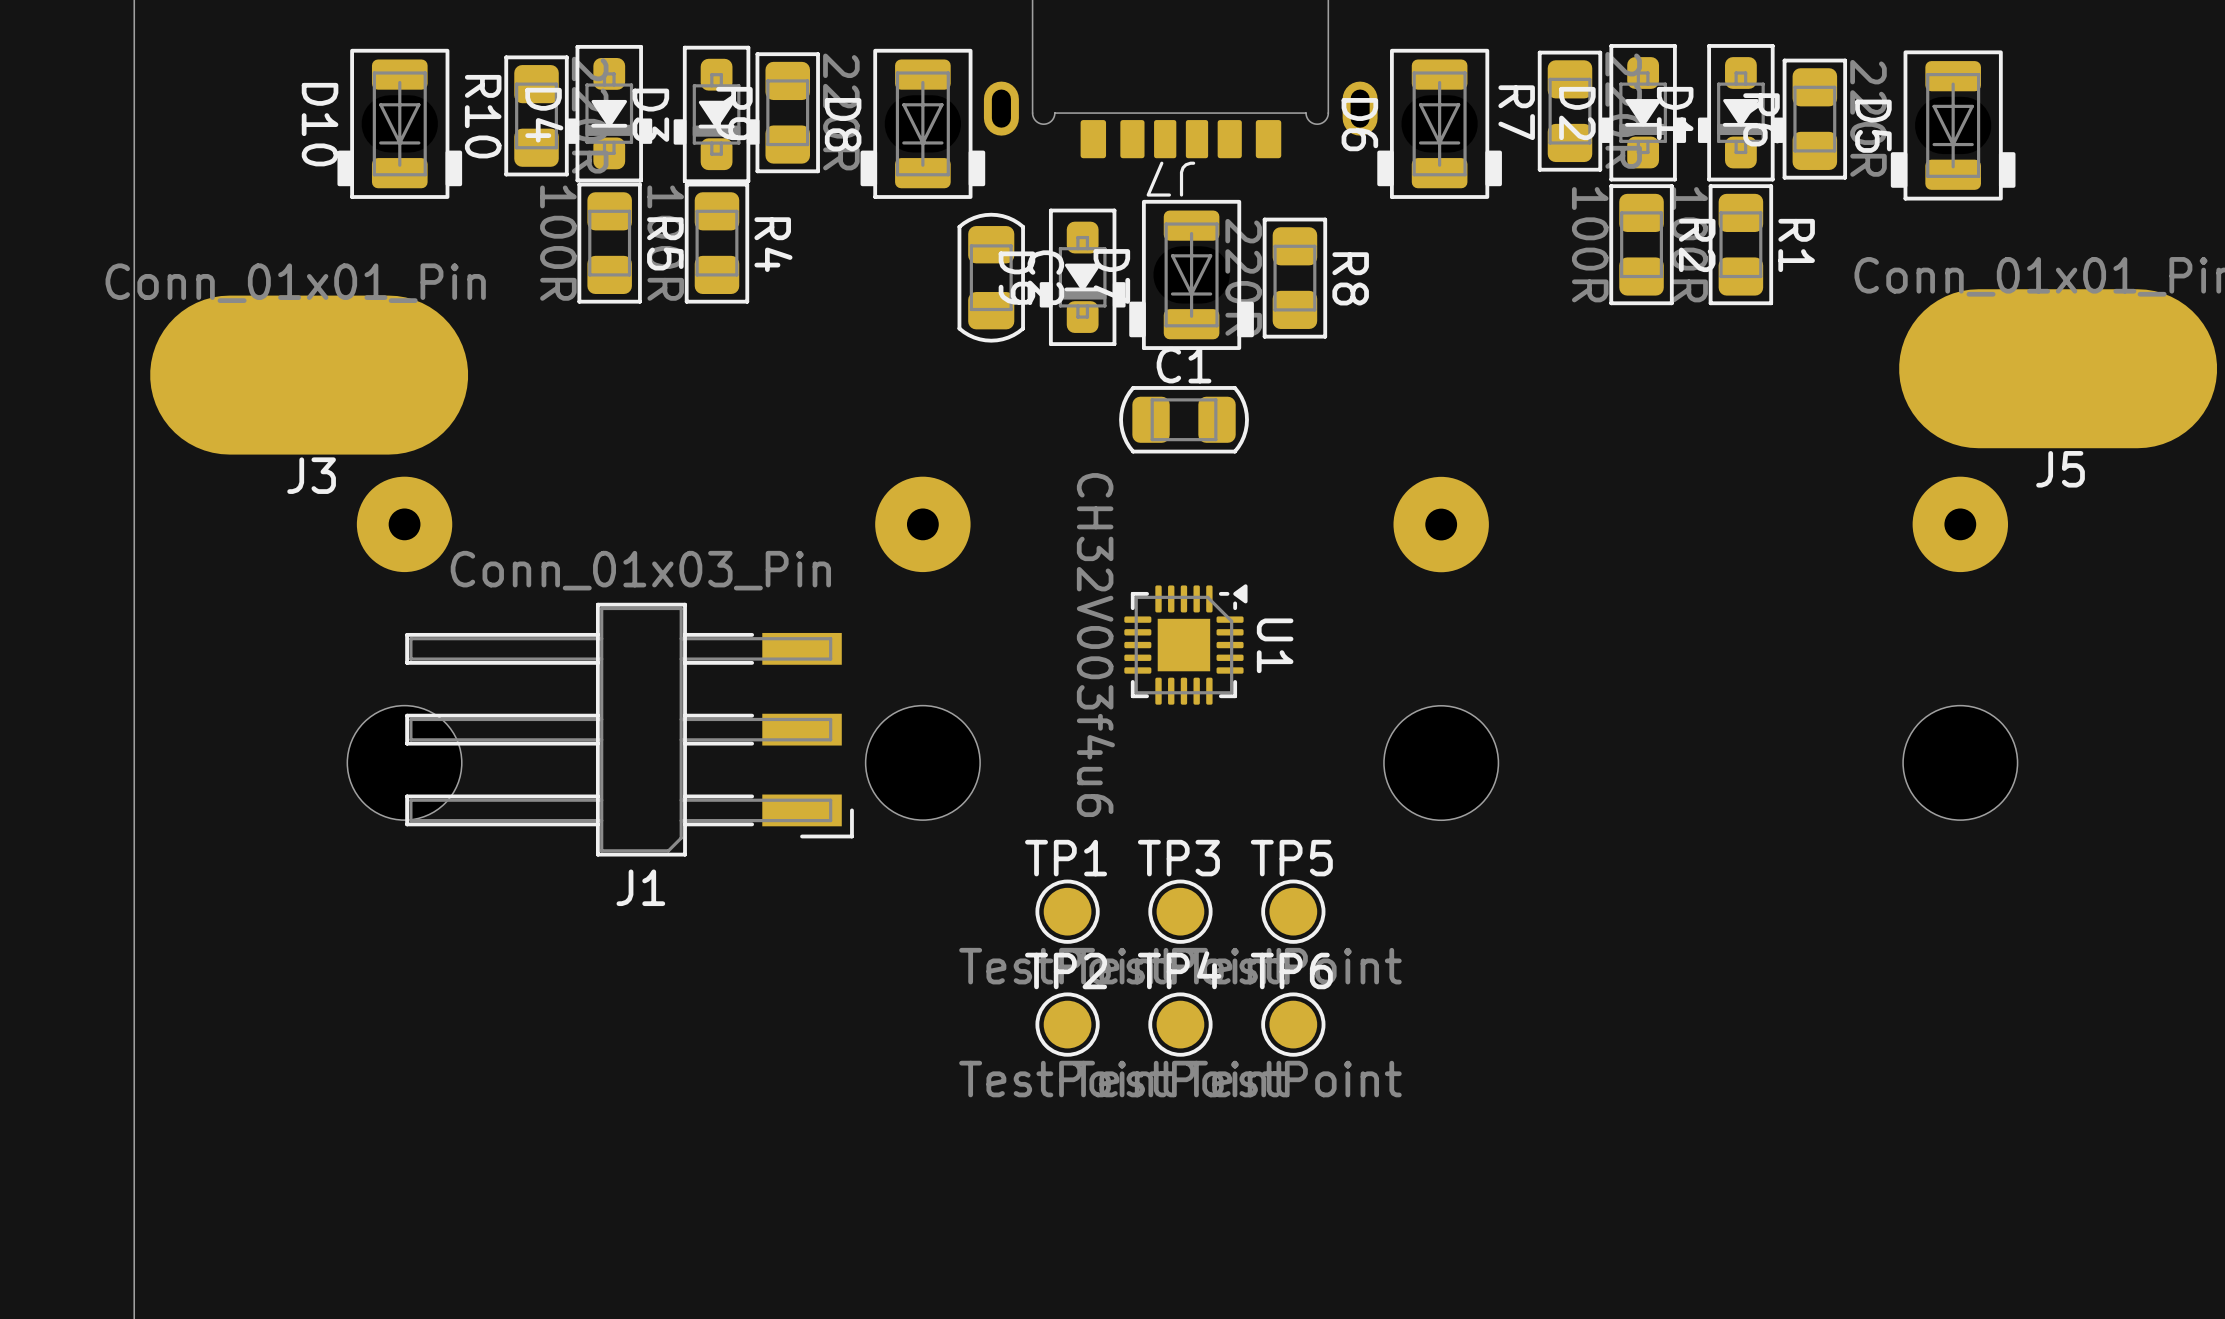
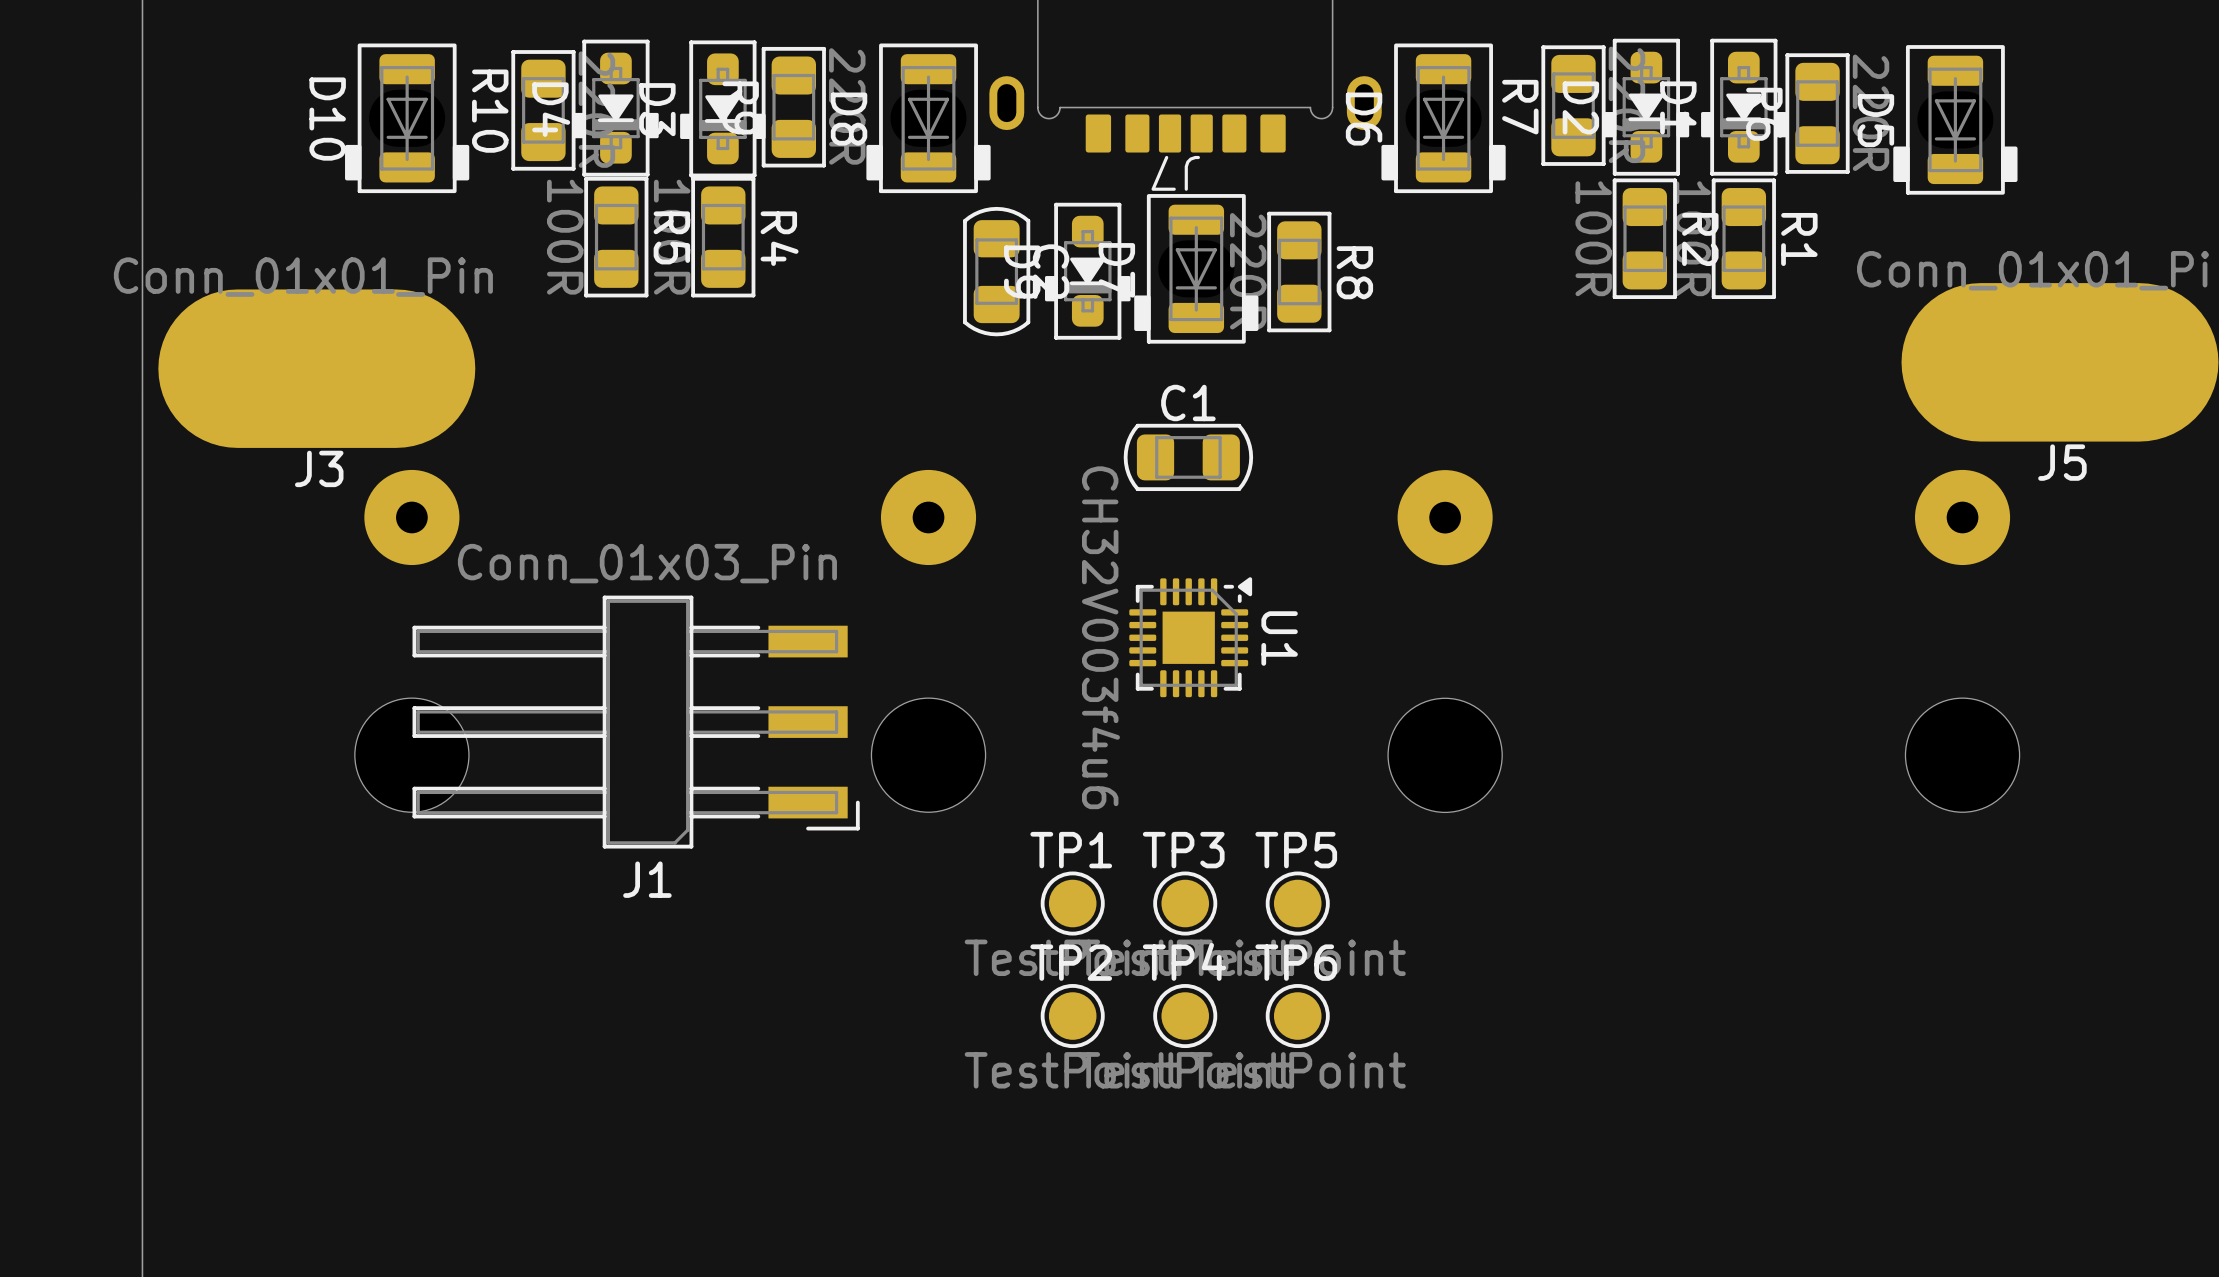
C1 position: (1184, 419) -> (1188, 457)

